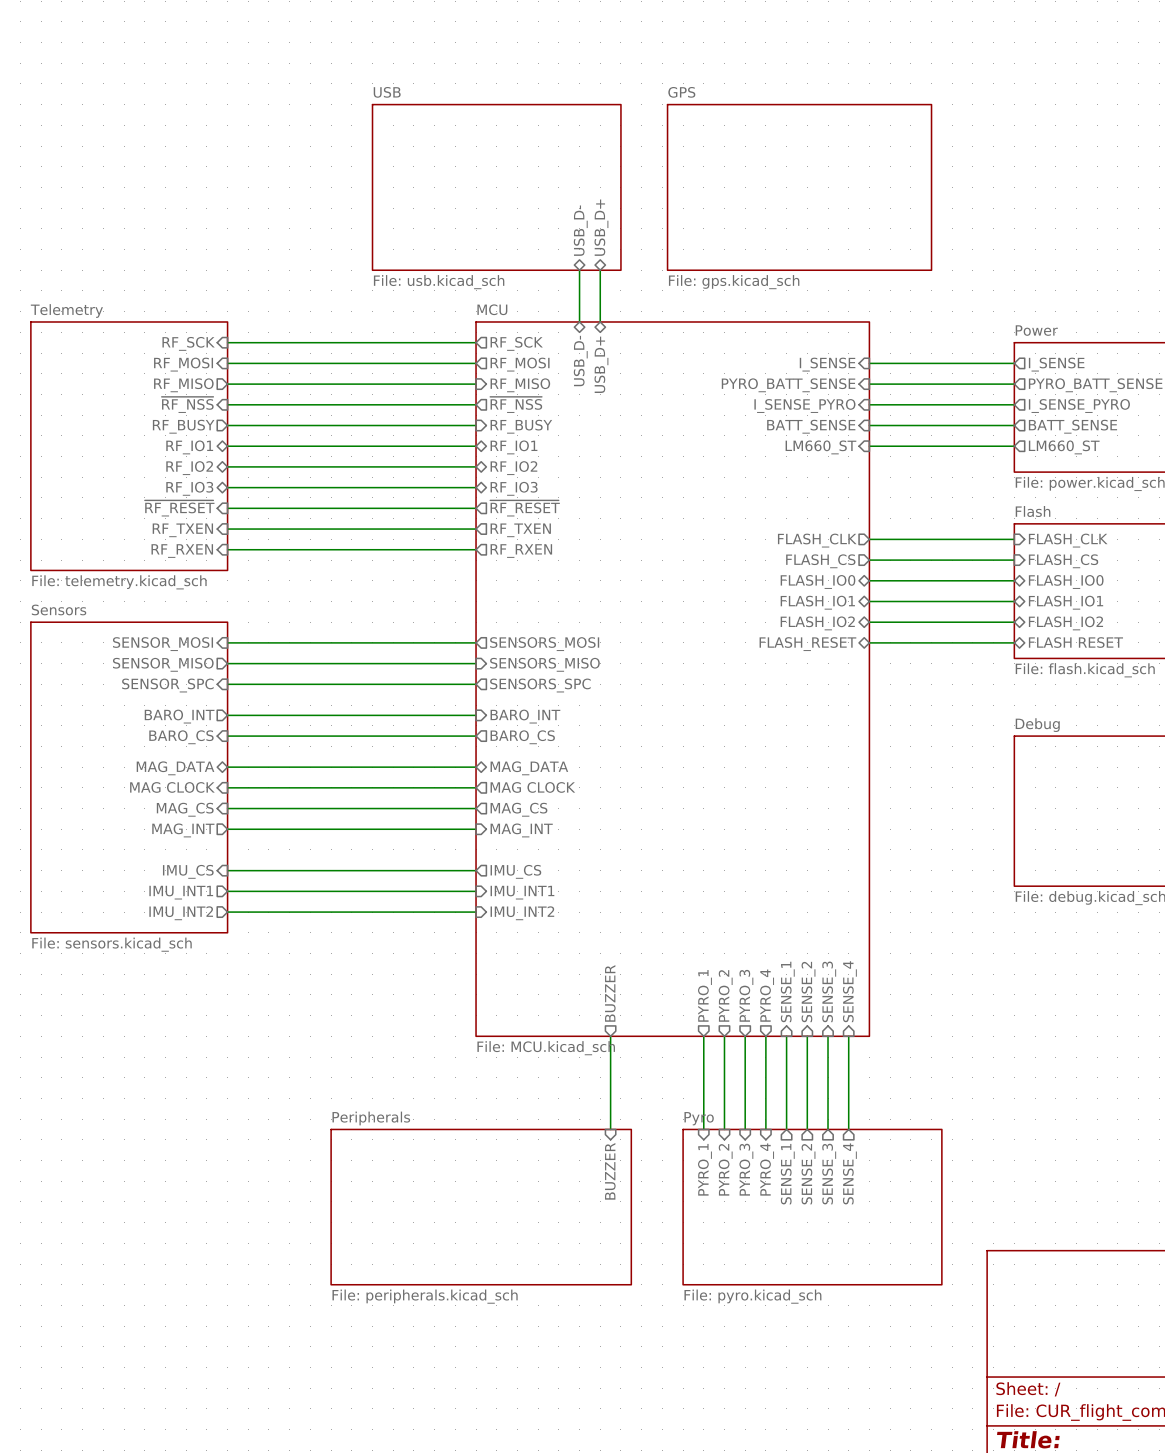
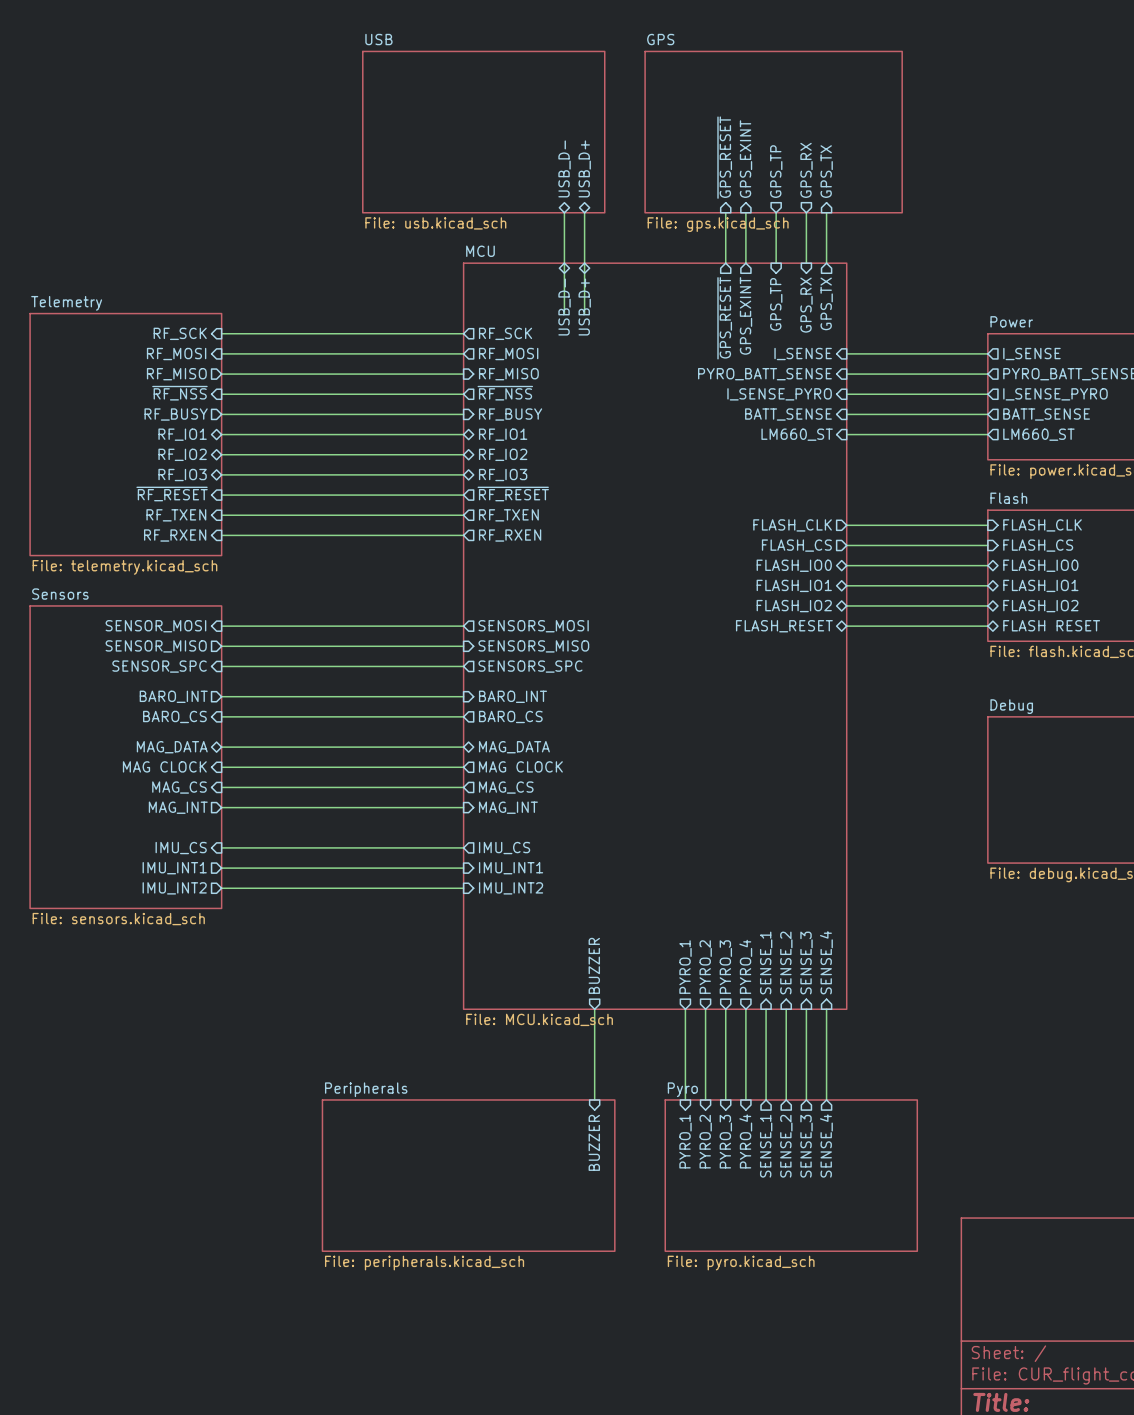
sheet pin: none -> ~{GPS_RESET} (724, 157)
sheet pin: none -> GPS_EXINT (746, 159)
sheet pin: none -> USB_D+ (584, 168)
sheet pin: none -> GPS_RX (806, 170)
sheet pin: none -> USB_D- (564, 168)
sheet pin: none -> GPS_TP (776, 171)
sheet pin: none -> GPS_TX (826, 171)
sheet USB position: (496, 187) -> (483, 132)
sheet GPS position: (799, 187) -> (773, 132)
wire: none -> (564, 212) (564, 263)
wire: none -> (584, 212) (584, 263)
wire: none -> (725, 212) (725, 263)
wire: none -> (745, 212) (745, 263)
wire: none -> (776, 212) (776, 263)
wire: none -> (806, 212) (806, 263)
wire: none -> (826, 212) (826, 263)
sheet pin: USB_D+ (601, 227) -> none
sheet pin: USB_D- (580, 230) -> none
sheet pin: none -> USB_D- (564, 307)
sheet pin: none -> GPS_TP (776, 304)
sheet pin: none -> GPS_RX (806, 305)
sheet pin: none -> GPS_TX (826, 303)
sheet pin: none -> USB_D+ (584, 307)
sheet pin: none -> GPS_EXINT (746, 315)
sheet pin: none -> ~{GPS_RESET} (724, 318)
sheet pin: USB_D- (580, 361) -> none
sheet pin: USB_D+ (601, 364) -> none
sheet MCU: none -> File: MCU.kicad_sch (655, 636)
sheet MCU: File: MCU.kicad_sch (672, 679) -> none

